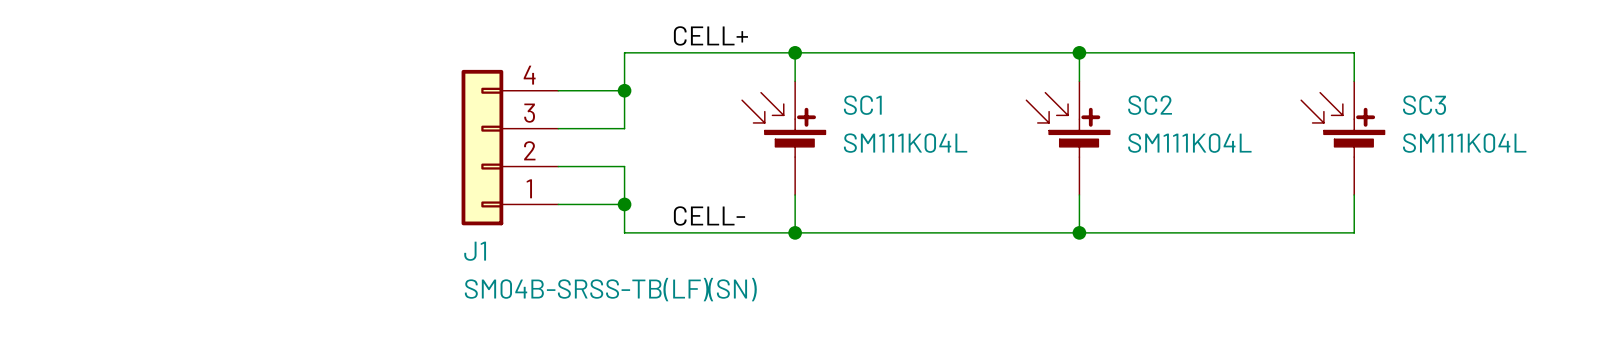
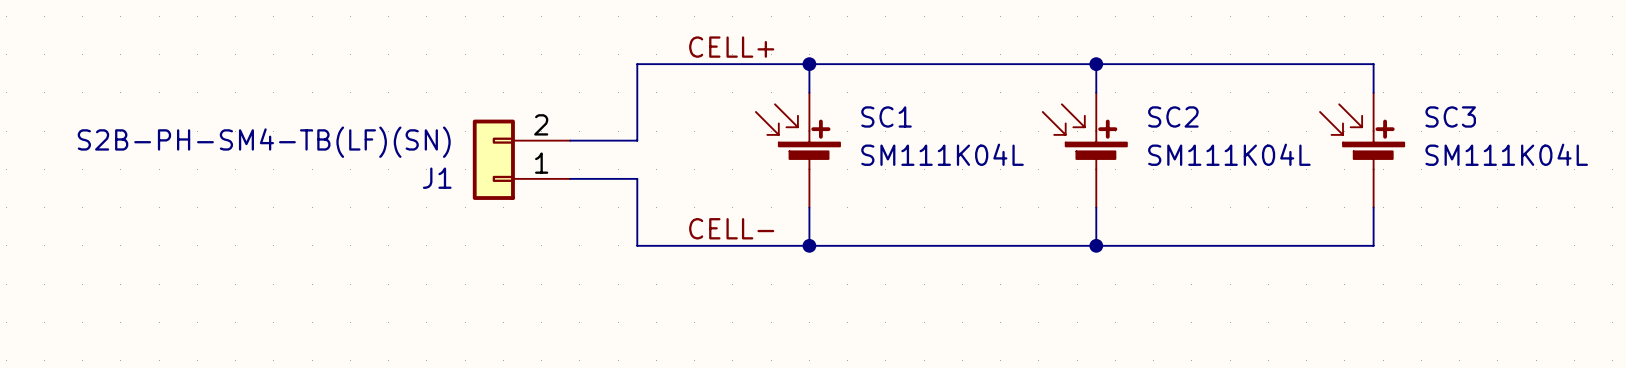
J1 symbol: [461, 69, 559, 226] -> [472, 119, 571, 200]
wire: (558, 90) (624, 90) -> none
junction: (624, 90) -> none
wire: (558, 204) (624, 204) -> none
junction: (624, 204) -> none
J1 name position: J1 (475, 251) -> J1 (437, 178)
J1 value: SM04B-SRSS-TB(LF)(SN) (610, 289) -> S2B-PH-SM4-TB(LF)(SN) (264, 142)

